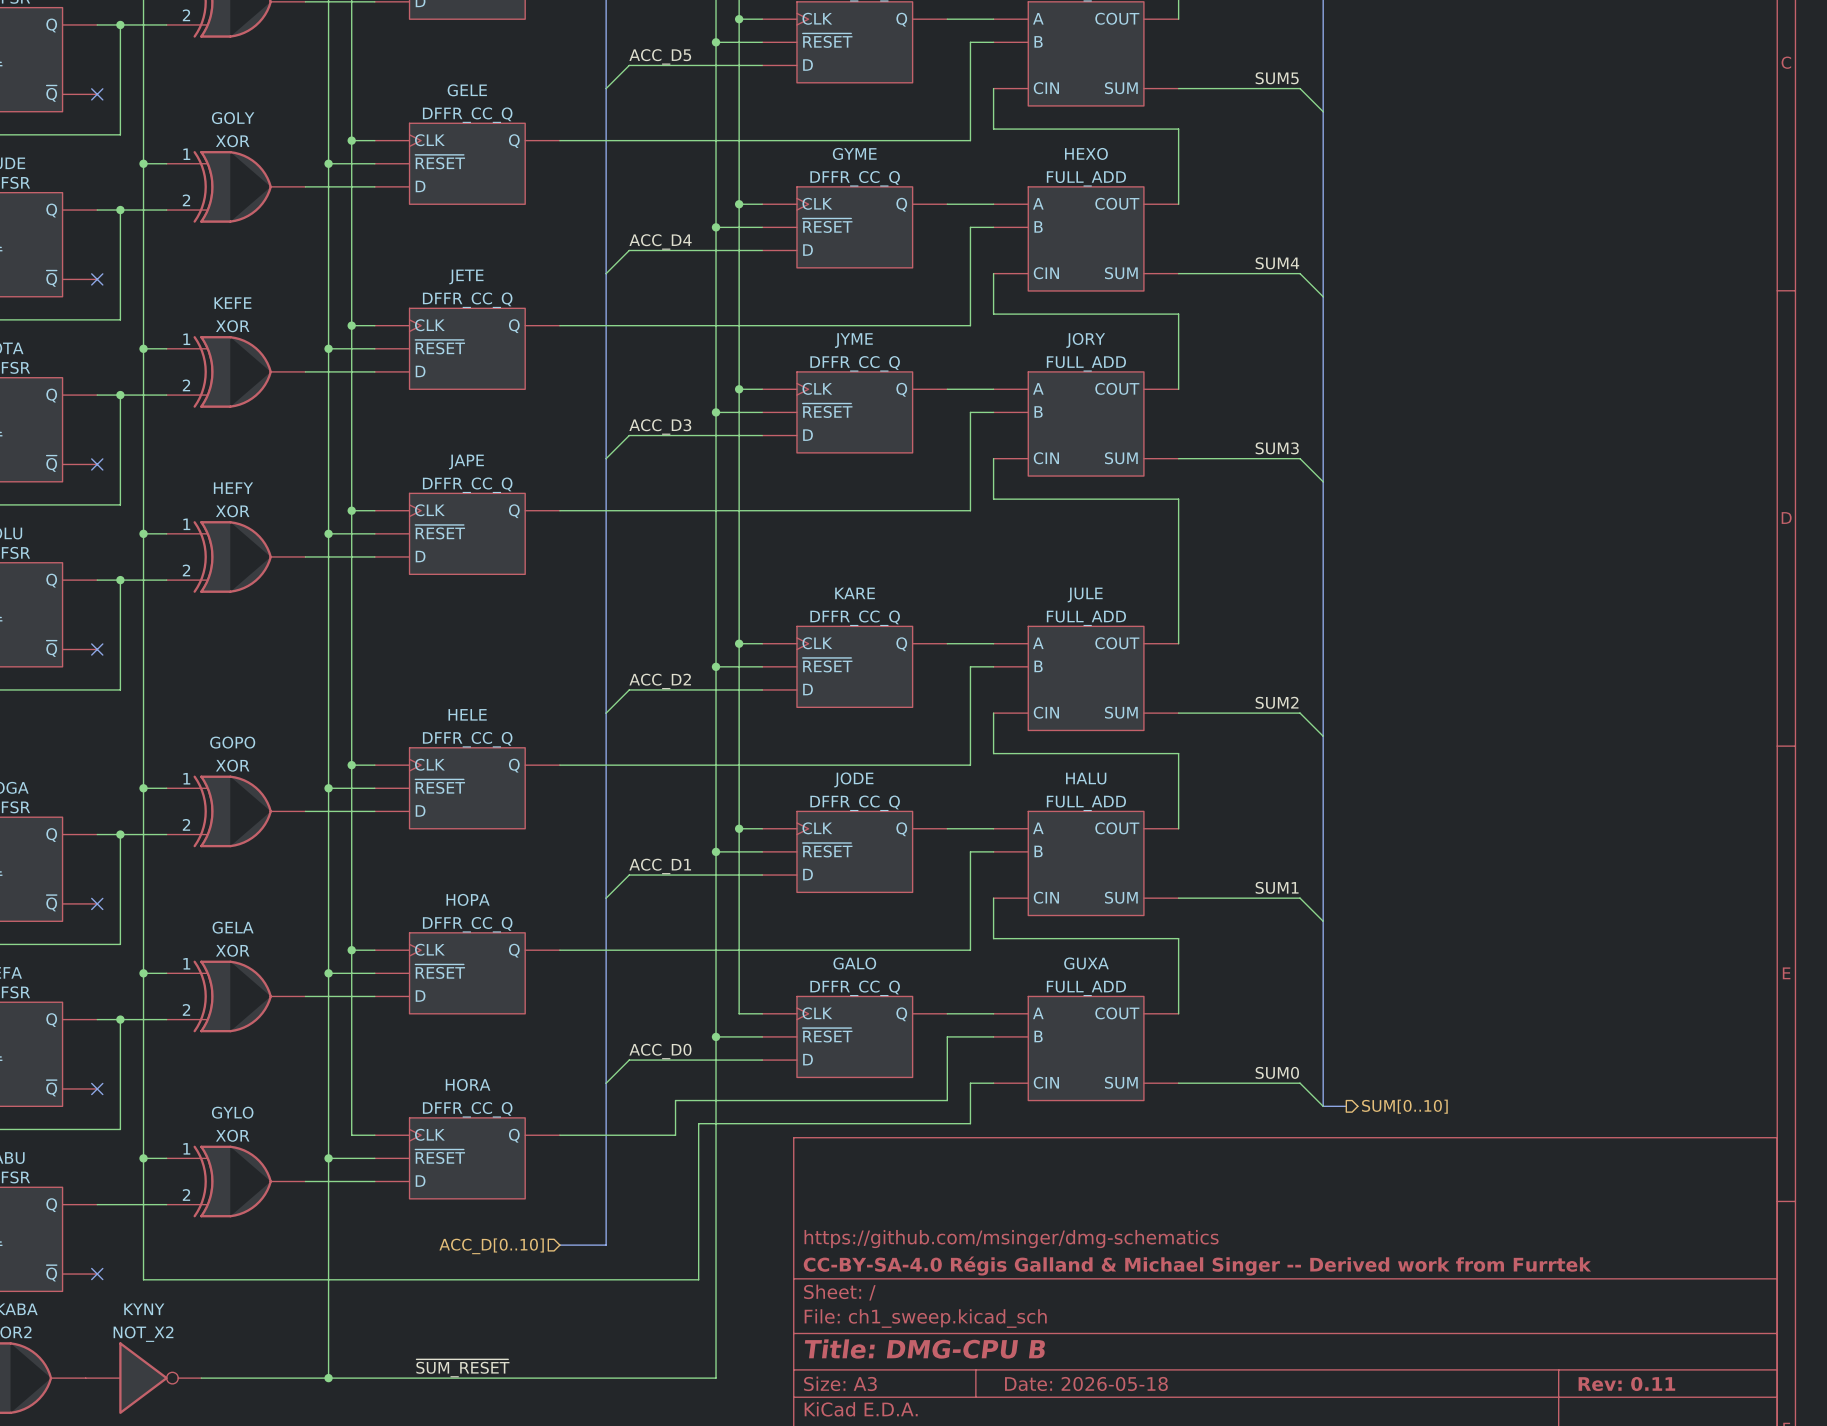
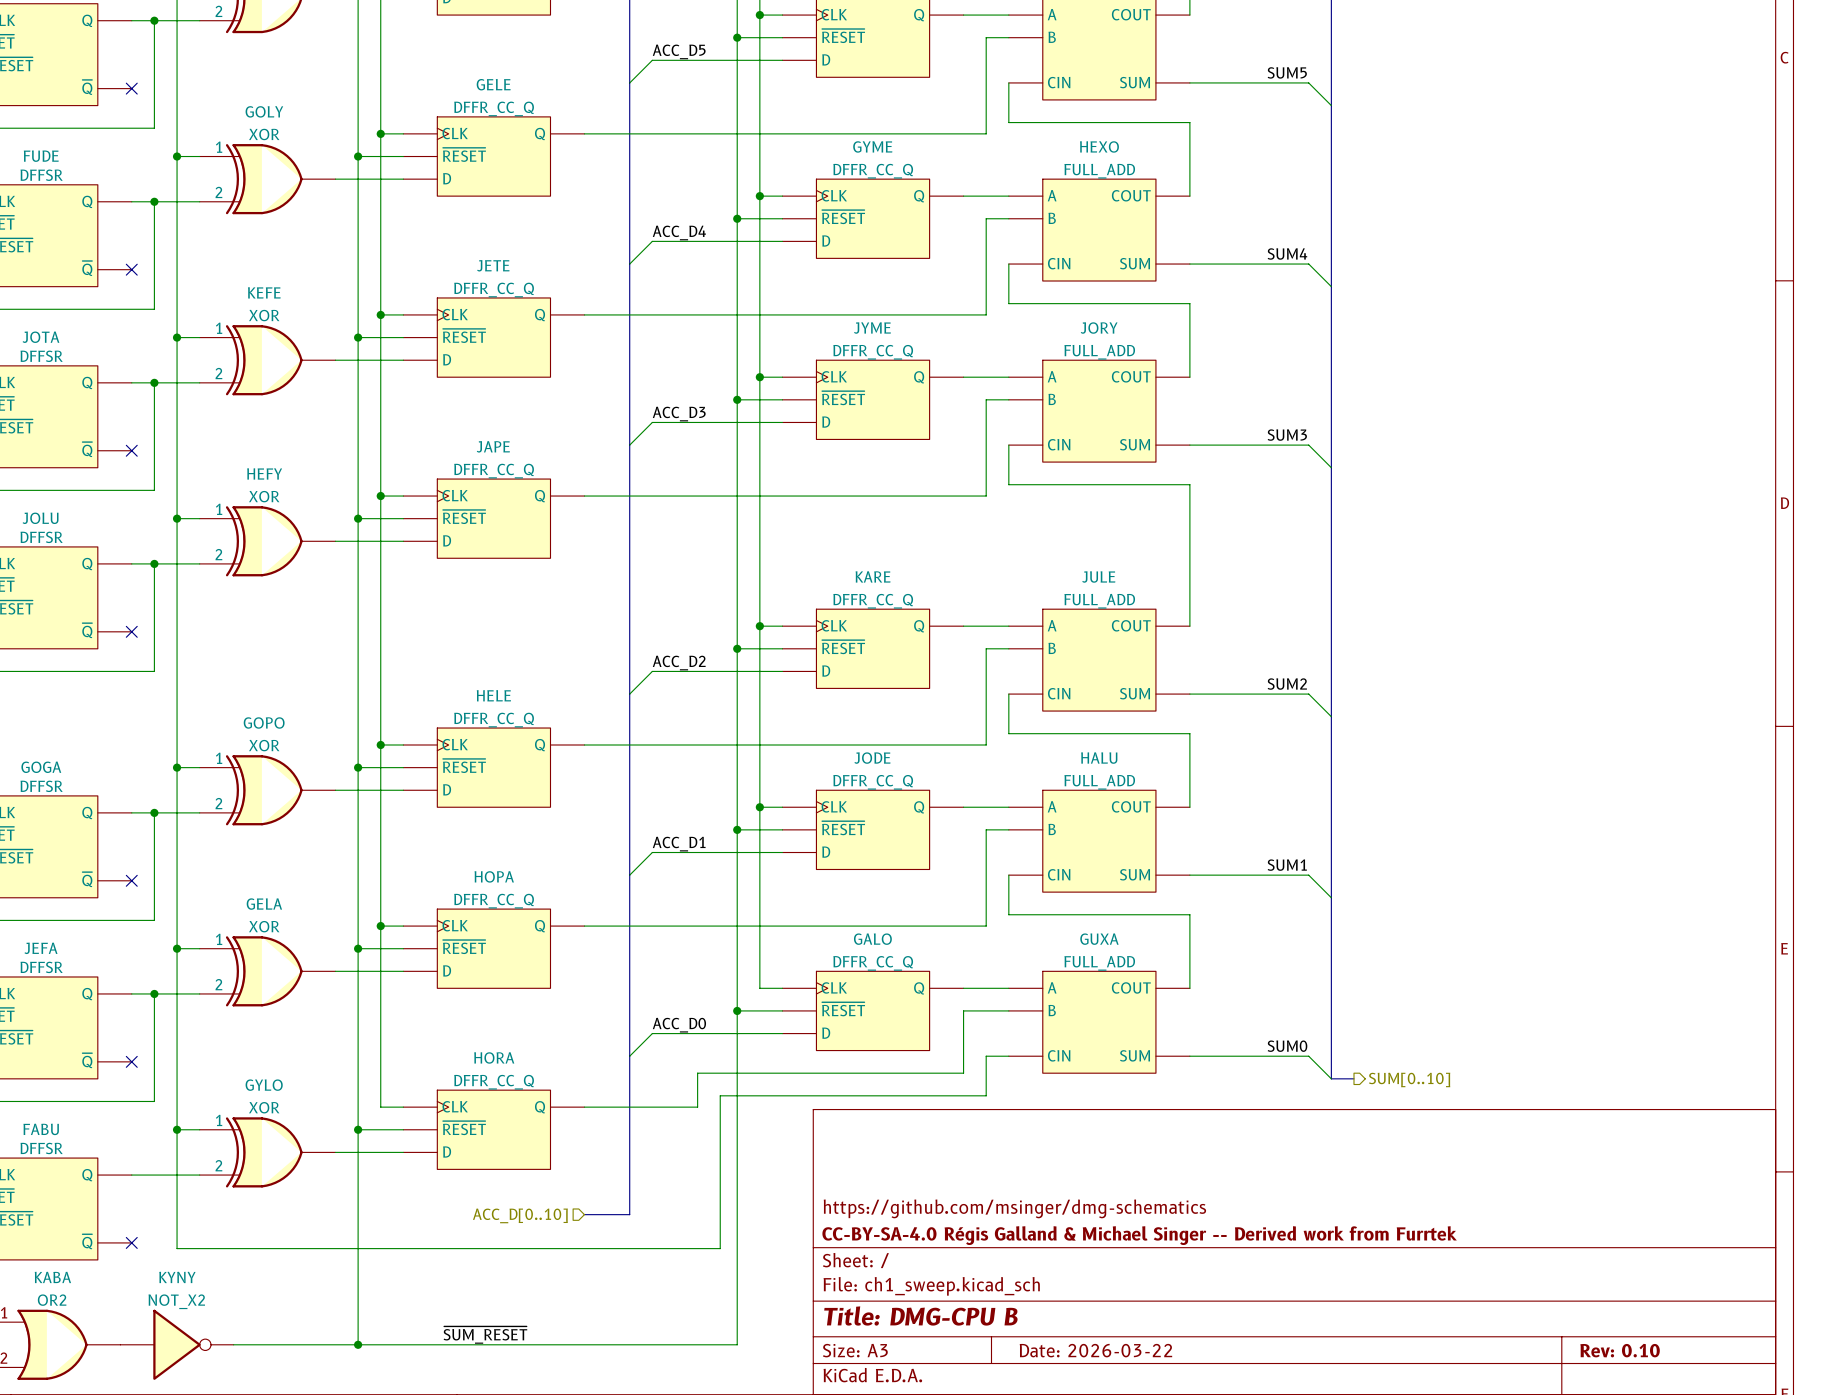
title block: Date: 2026-05-18 (1086, 1383) -> Date: 2026-03-22 (1095, 1350)
title block: Rev: 0.11 (1626, 1383) -> Rev: 0.10 (1620, 1350)

